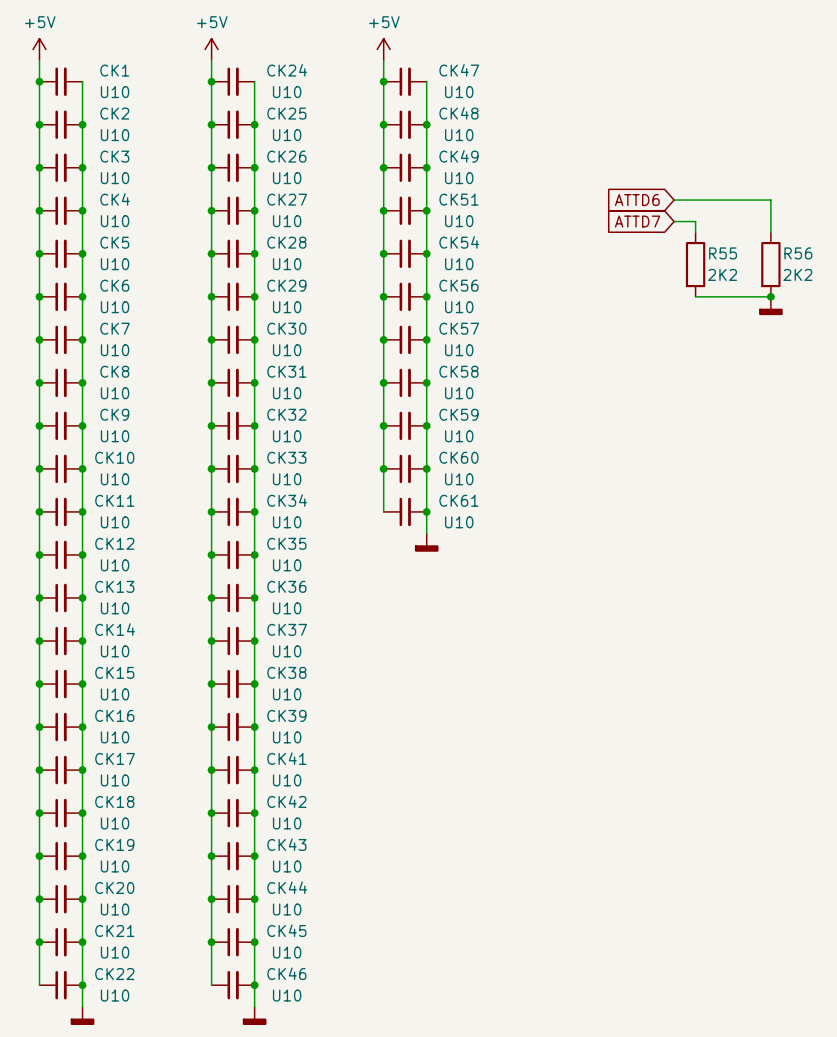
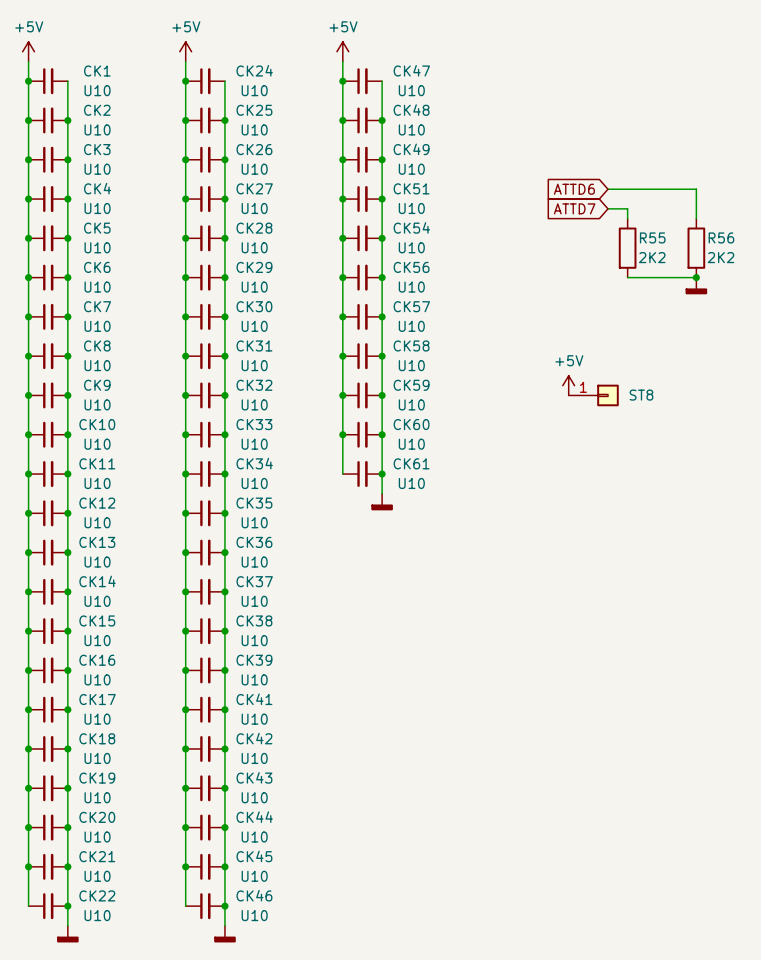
power symbol: none -> +5V (568, 385)
ST8: none -> (593, 395)

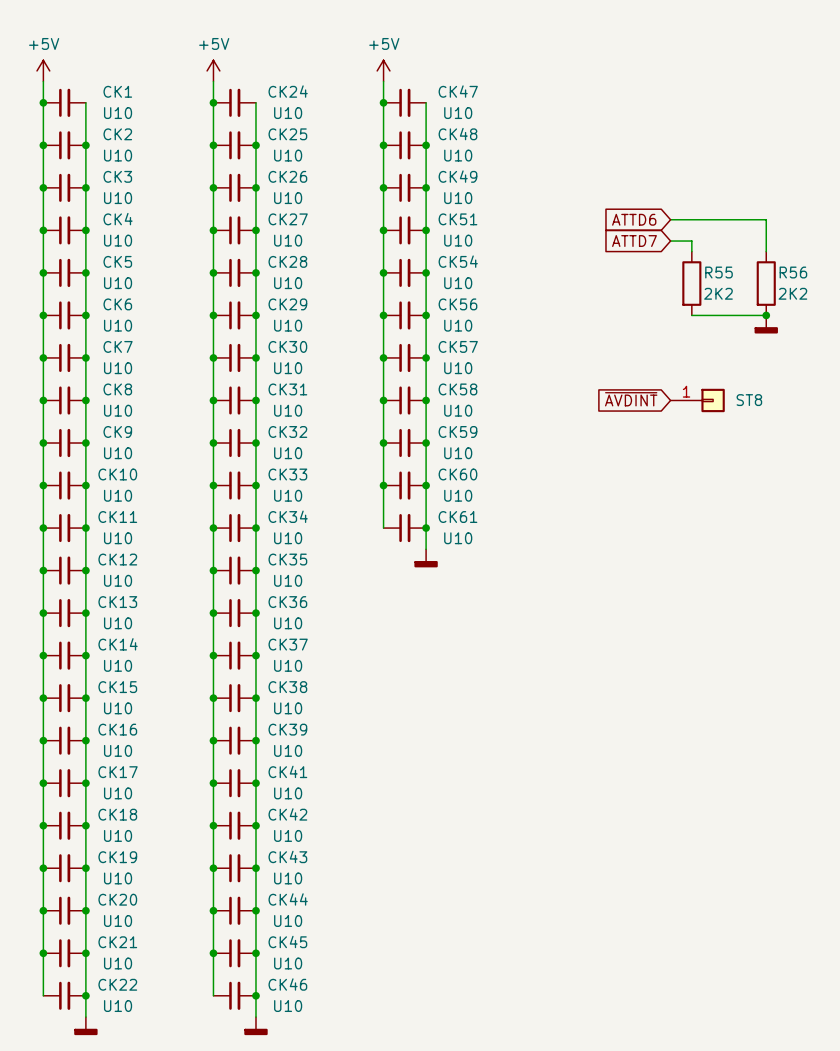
global label: none -> ~{AVDINT} (631, 399)
power symbol: +5V (568, 385) -> none
ST8 position: (593, 395) -> (697, 400)

